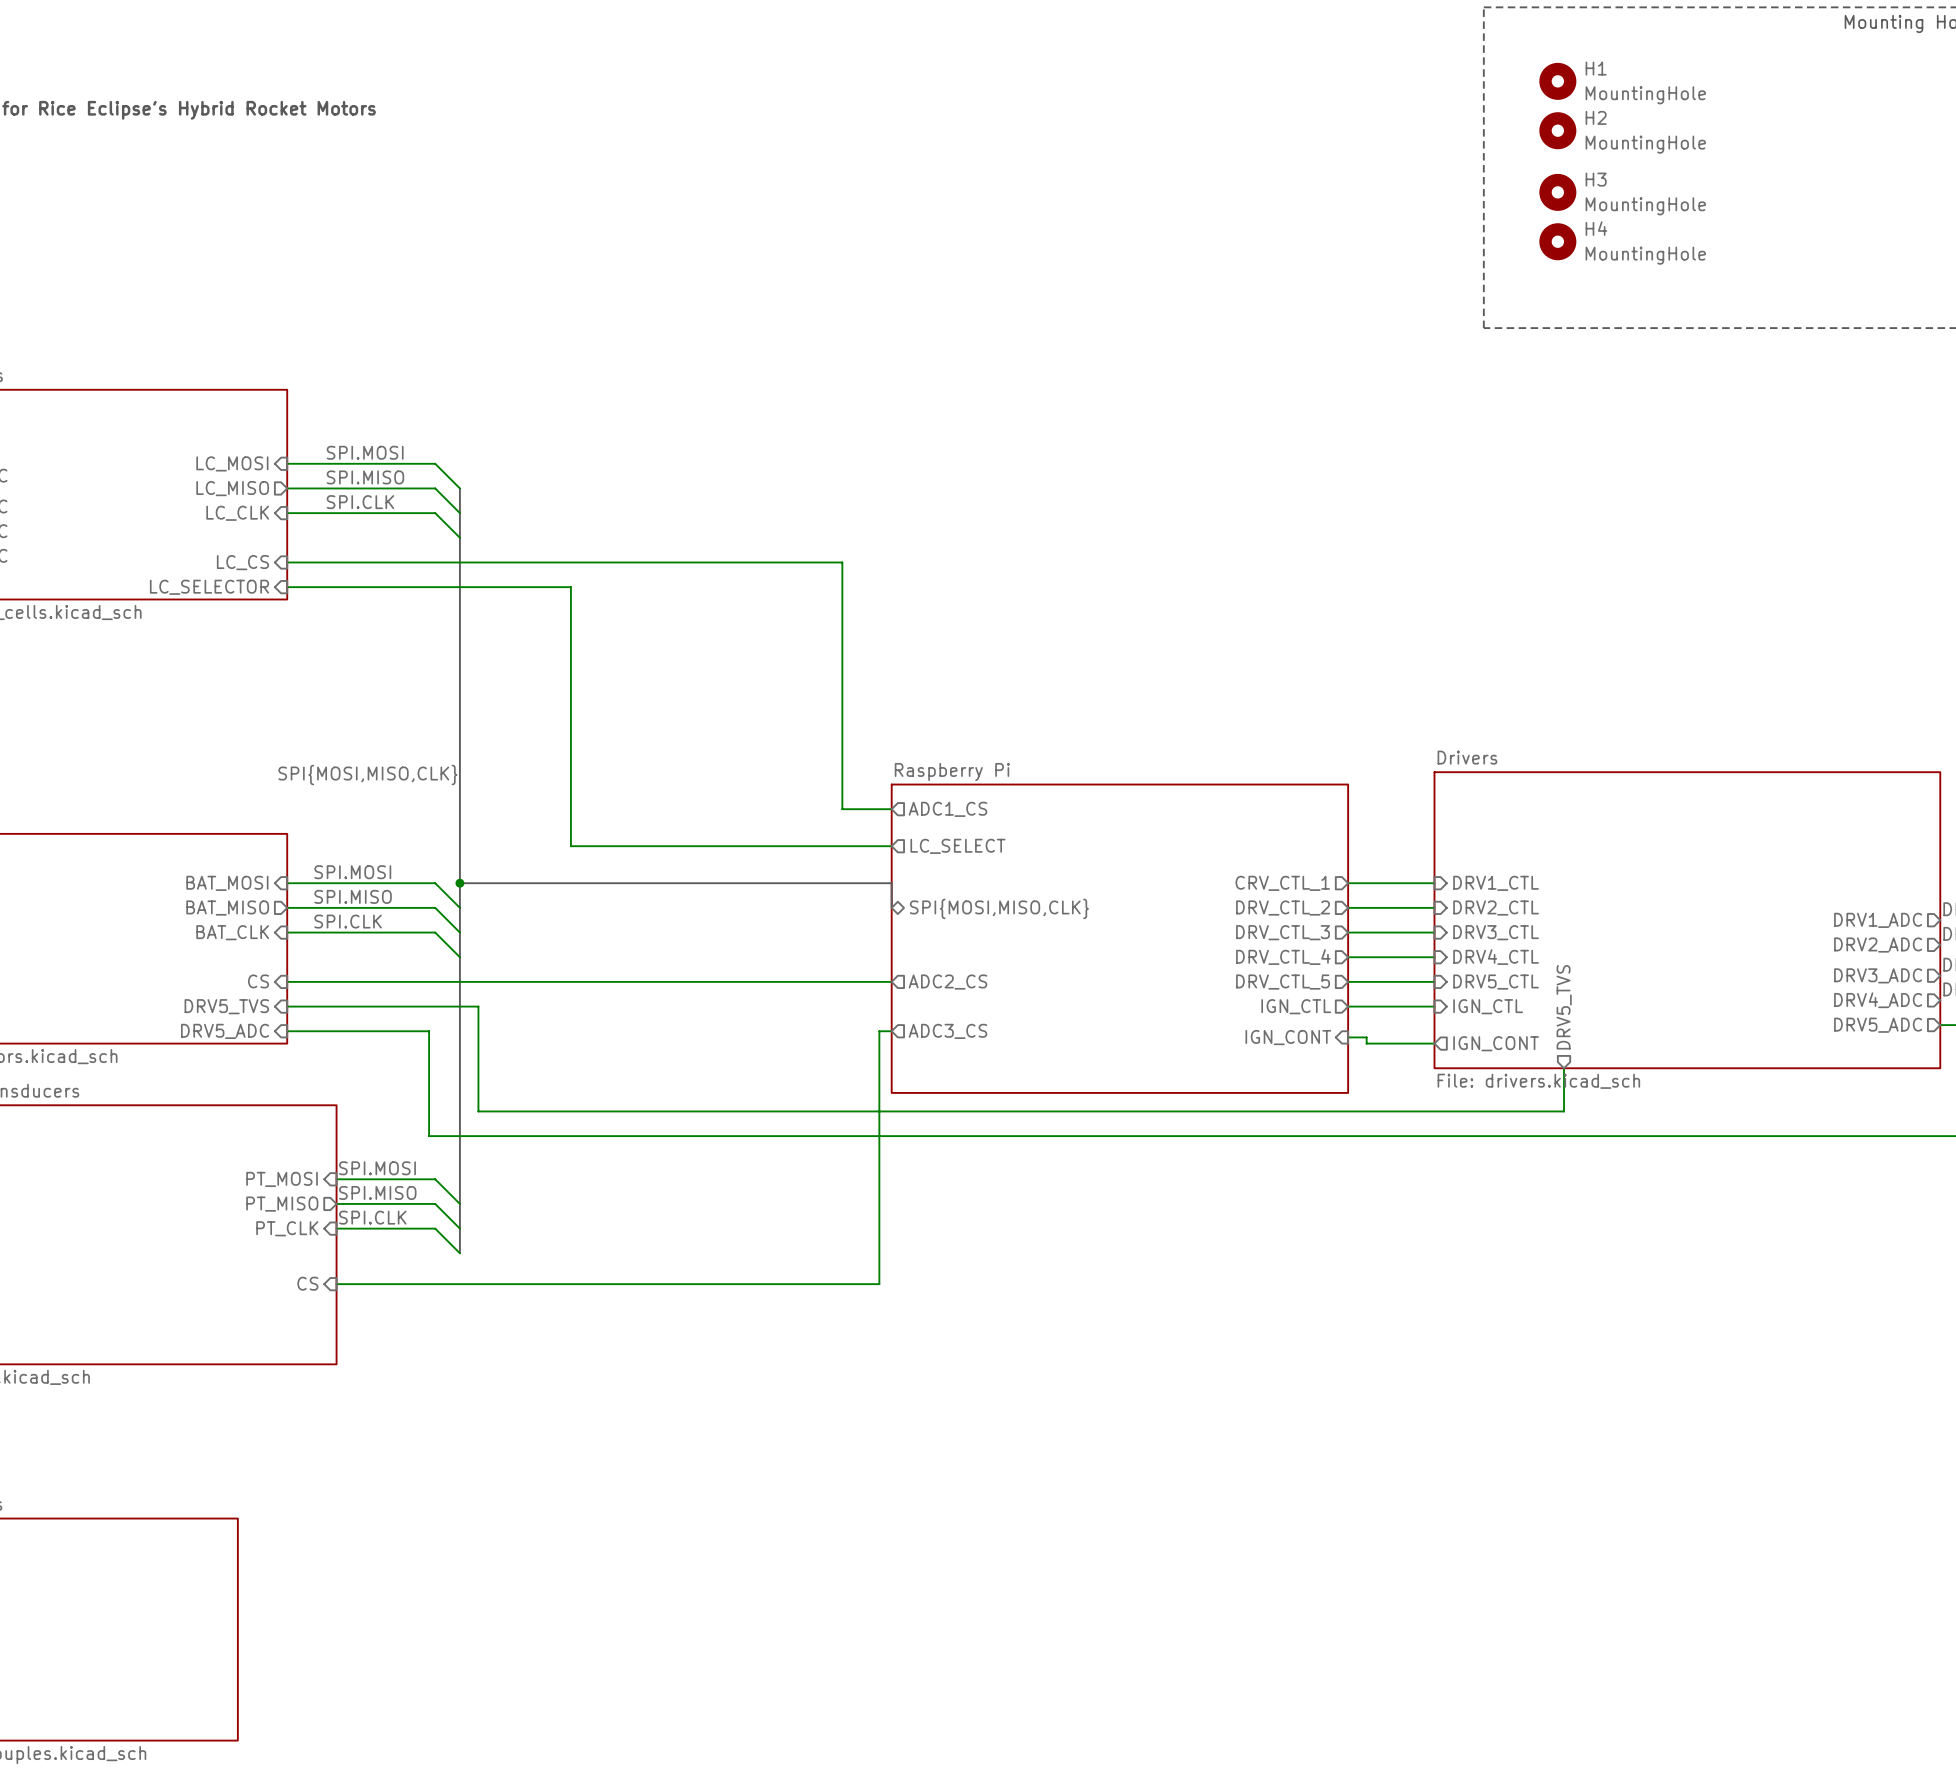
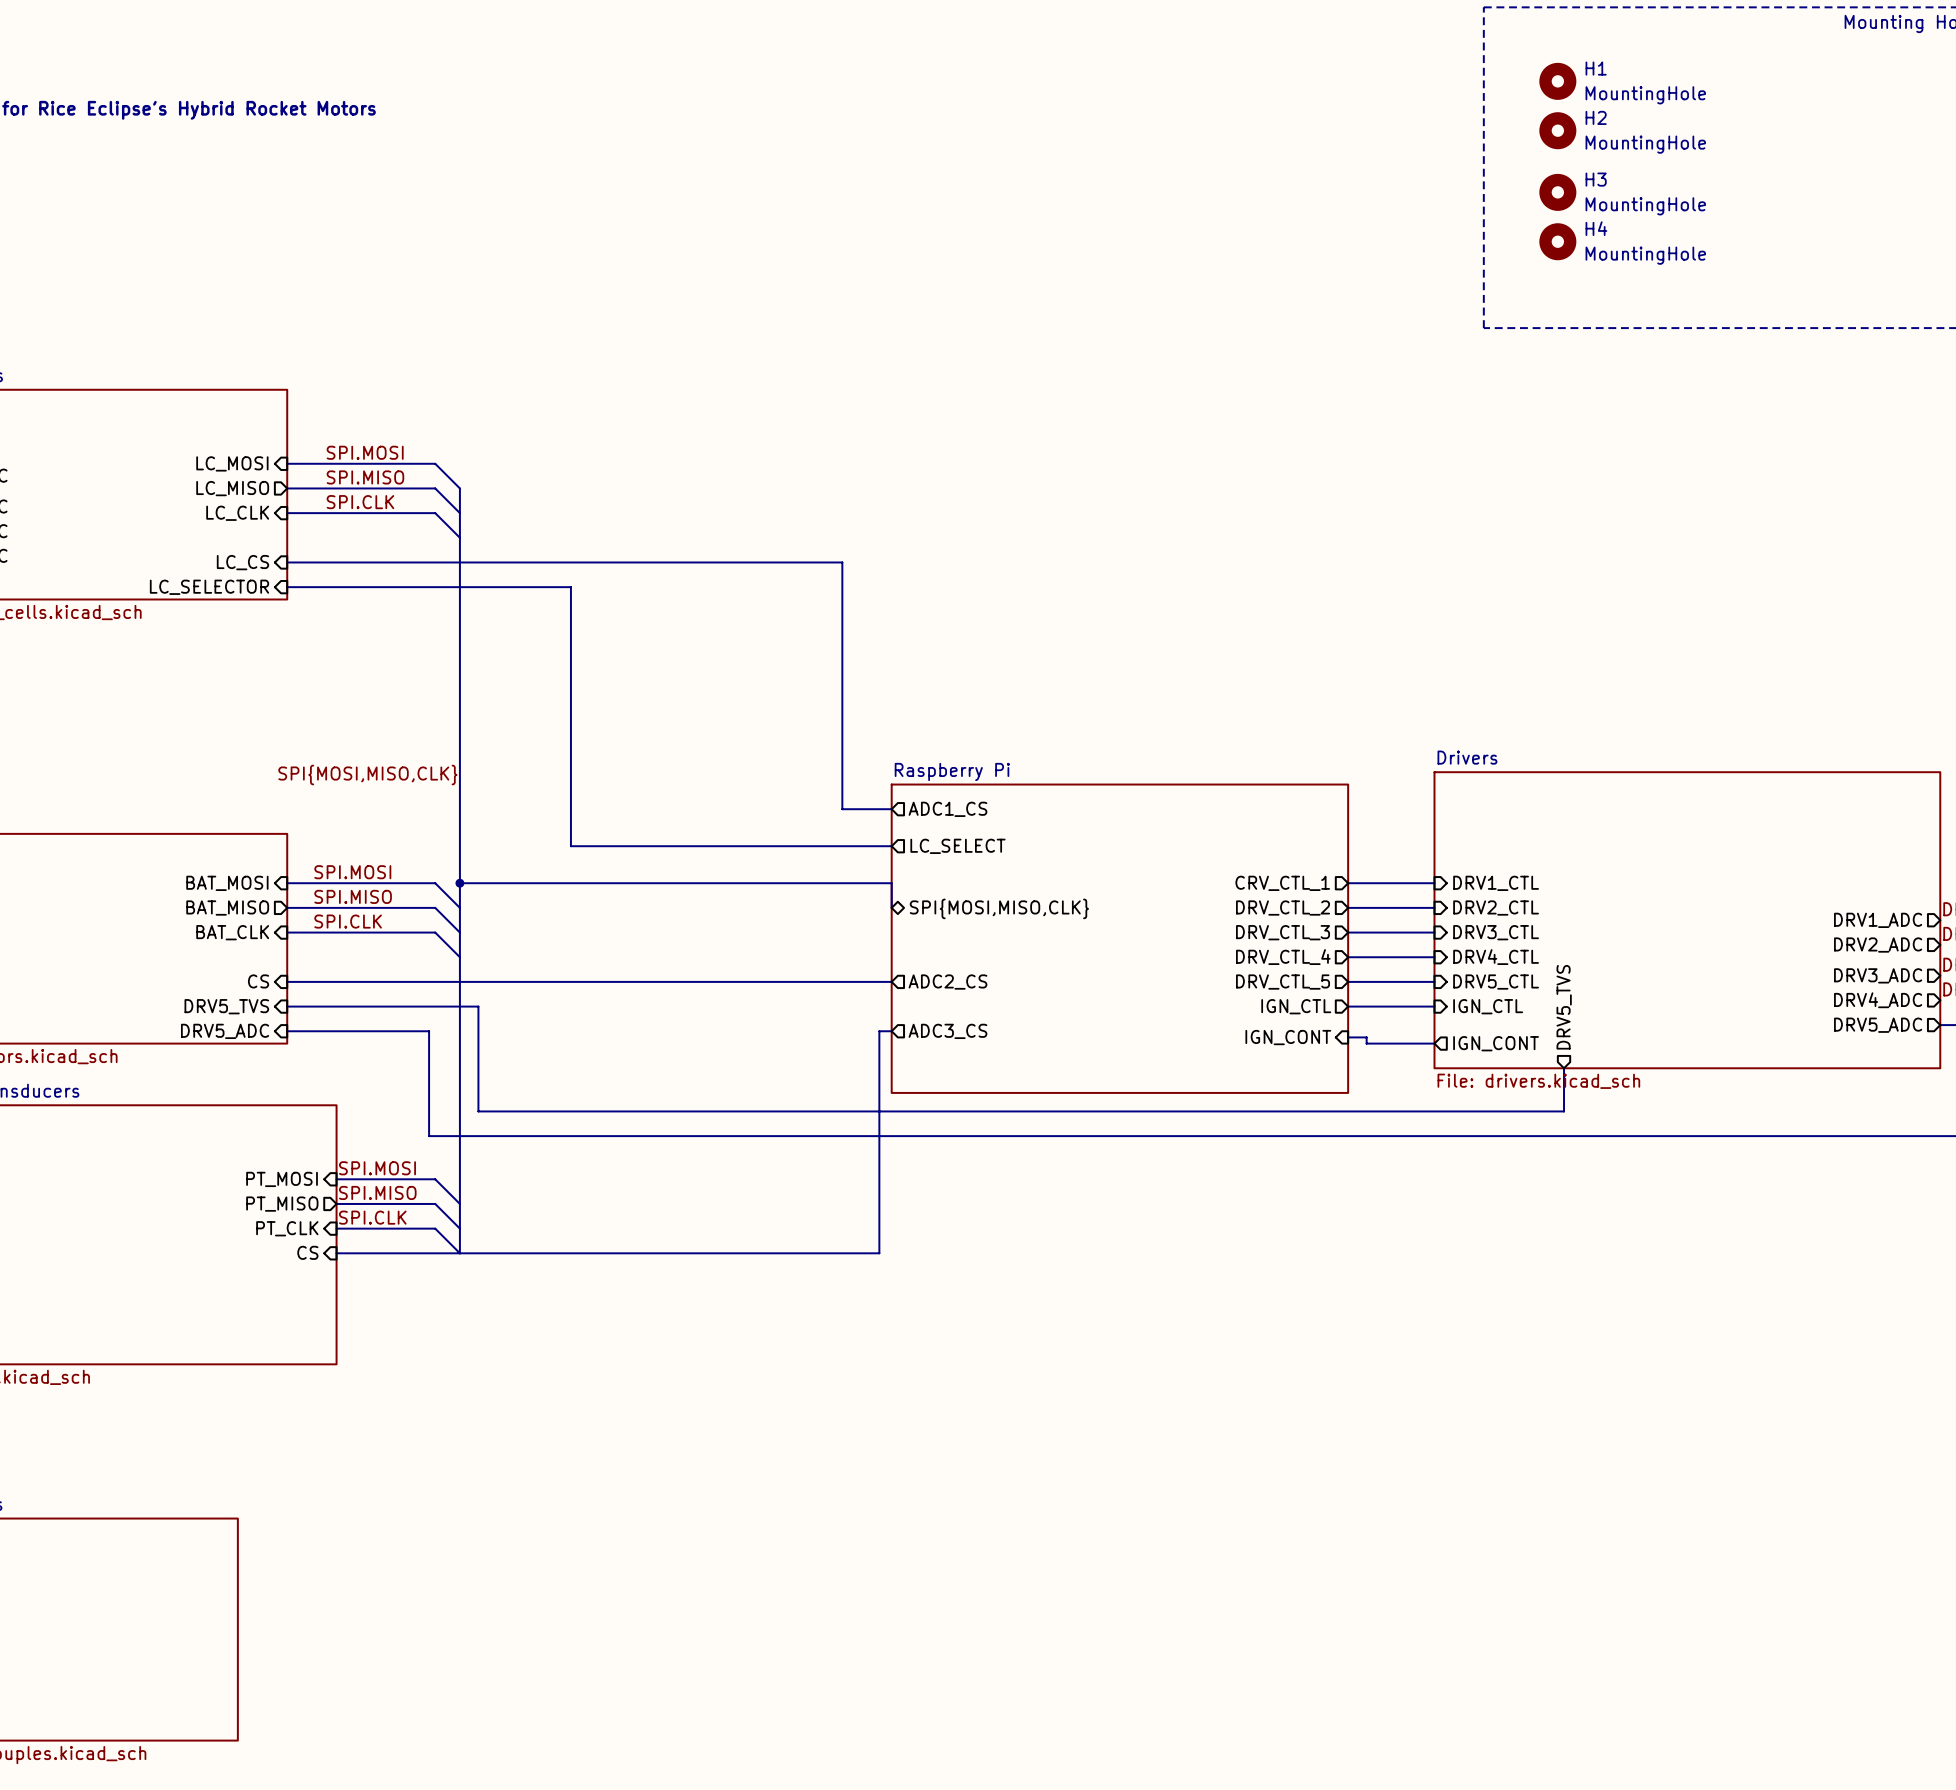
wire: (879, 1253) (879, 1284) (336, 1284) -> (879, 1253) (336, 1253)
sheet pin position: CS (307, 1283) -> CS (307, 1252)

